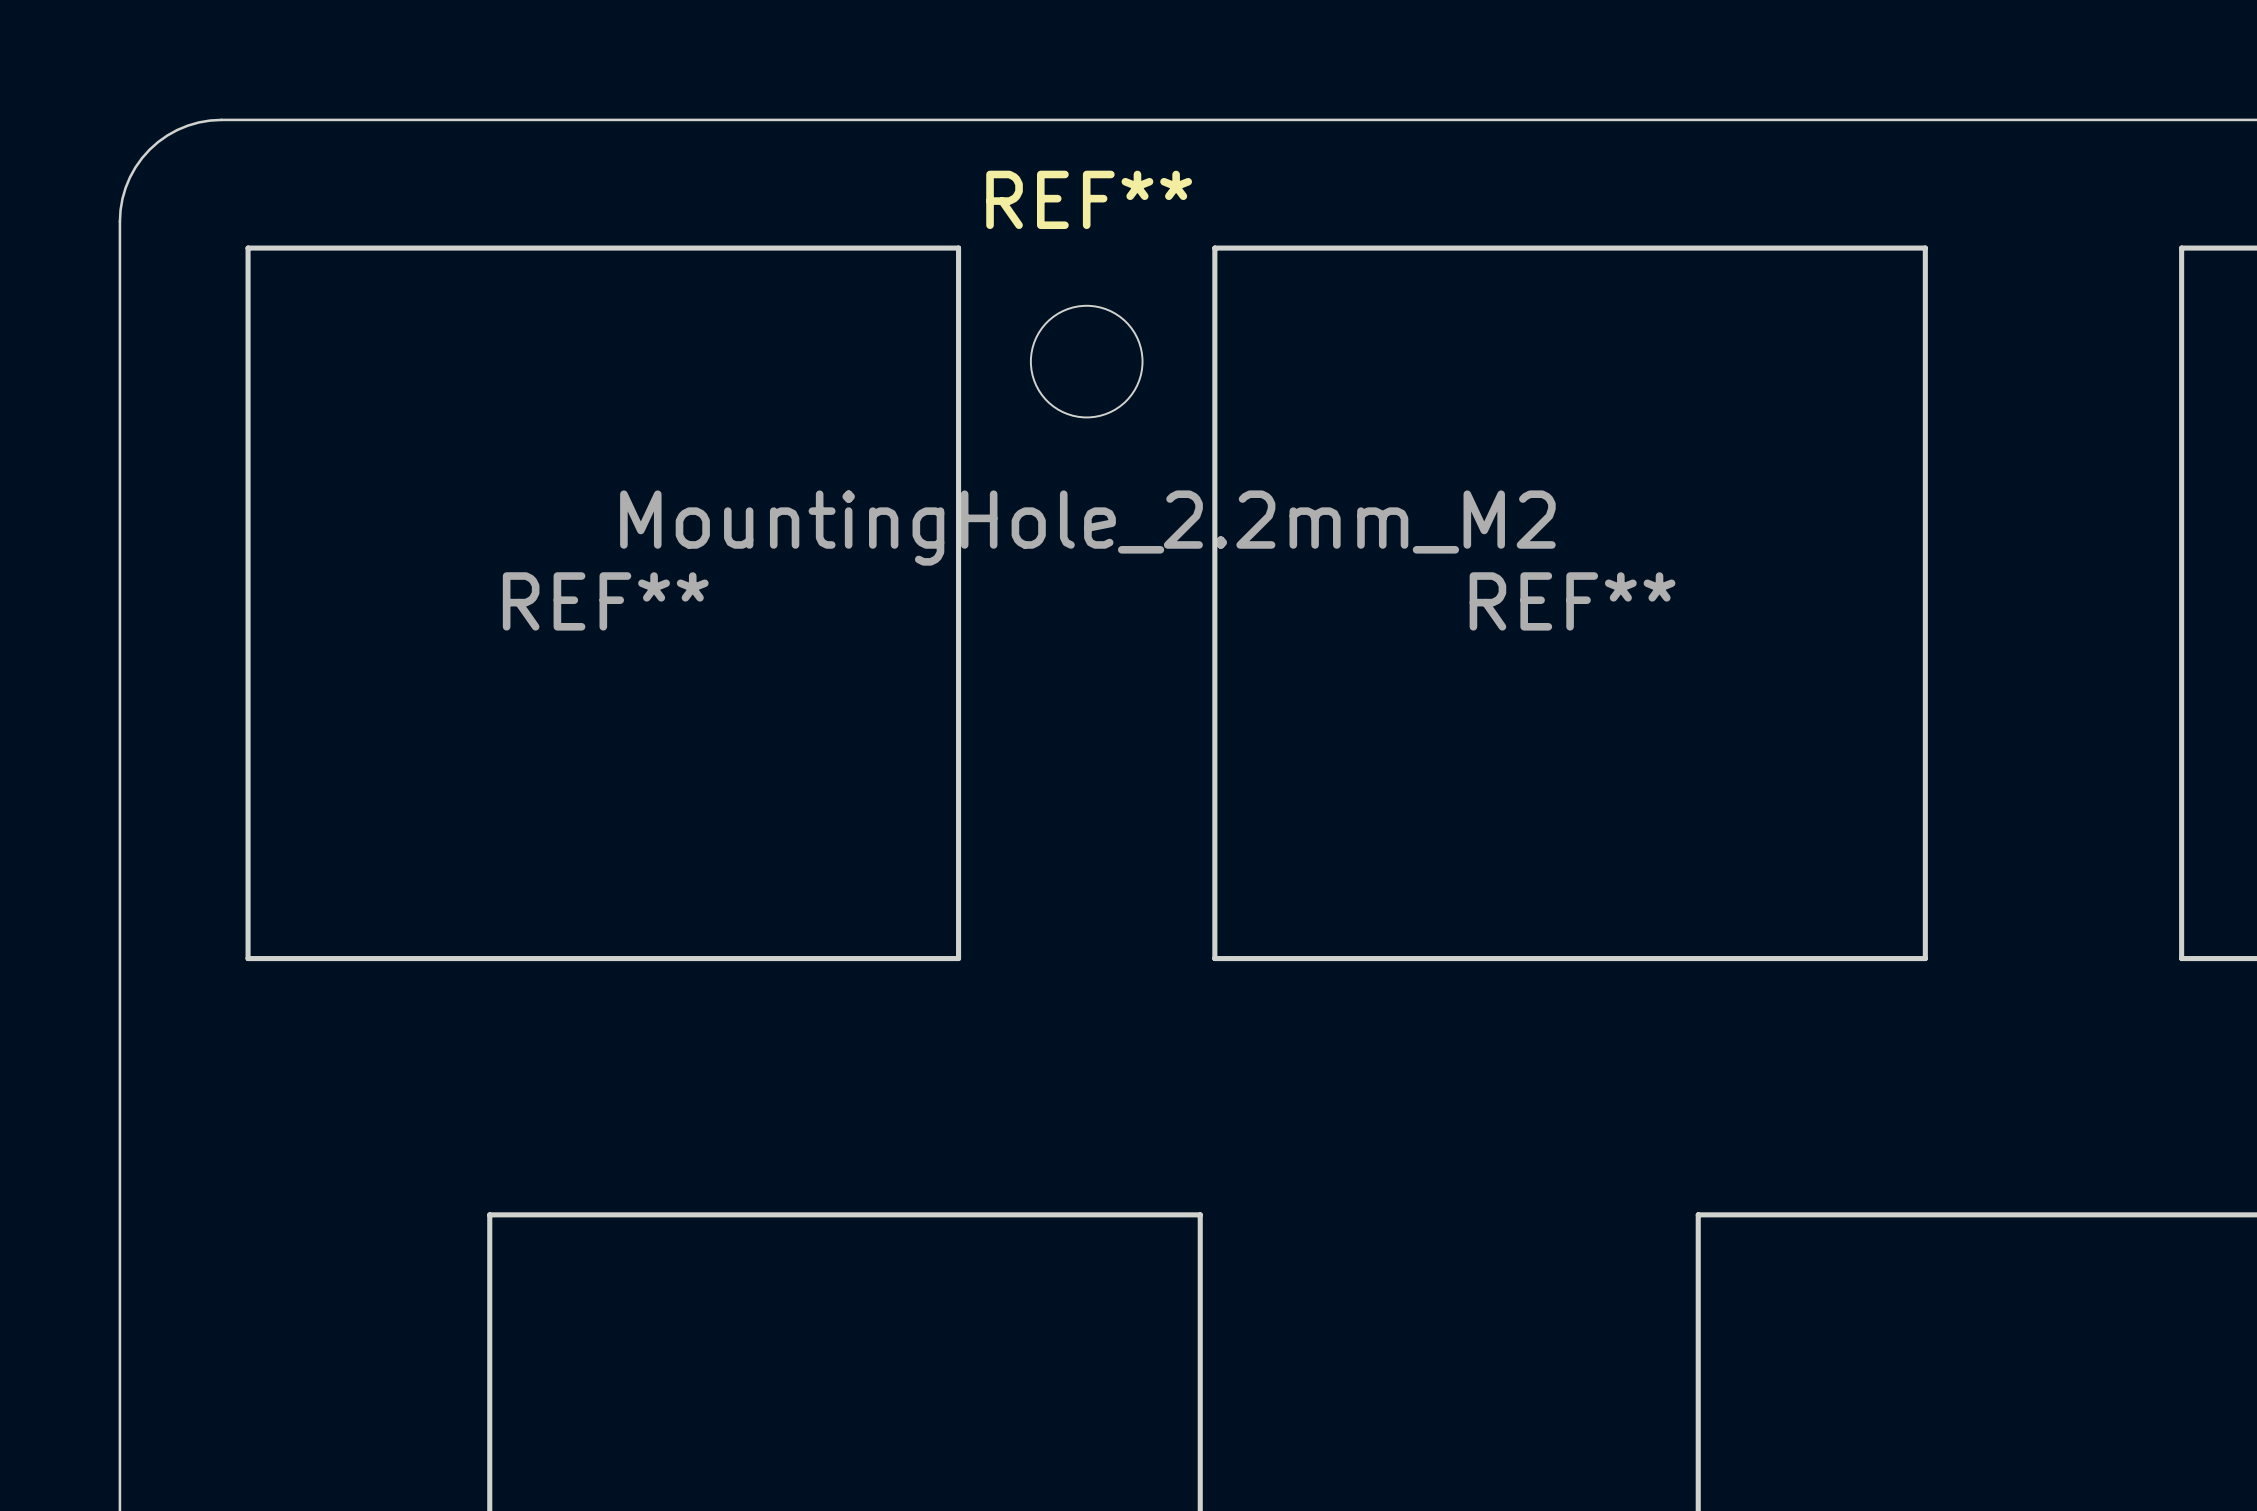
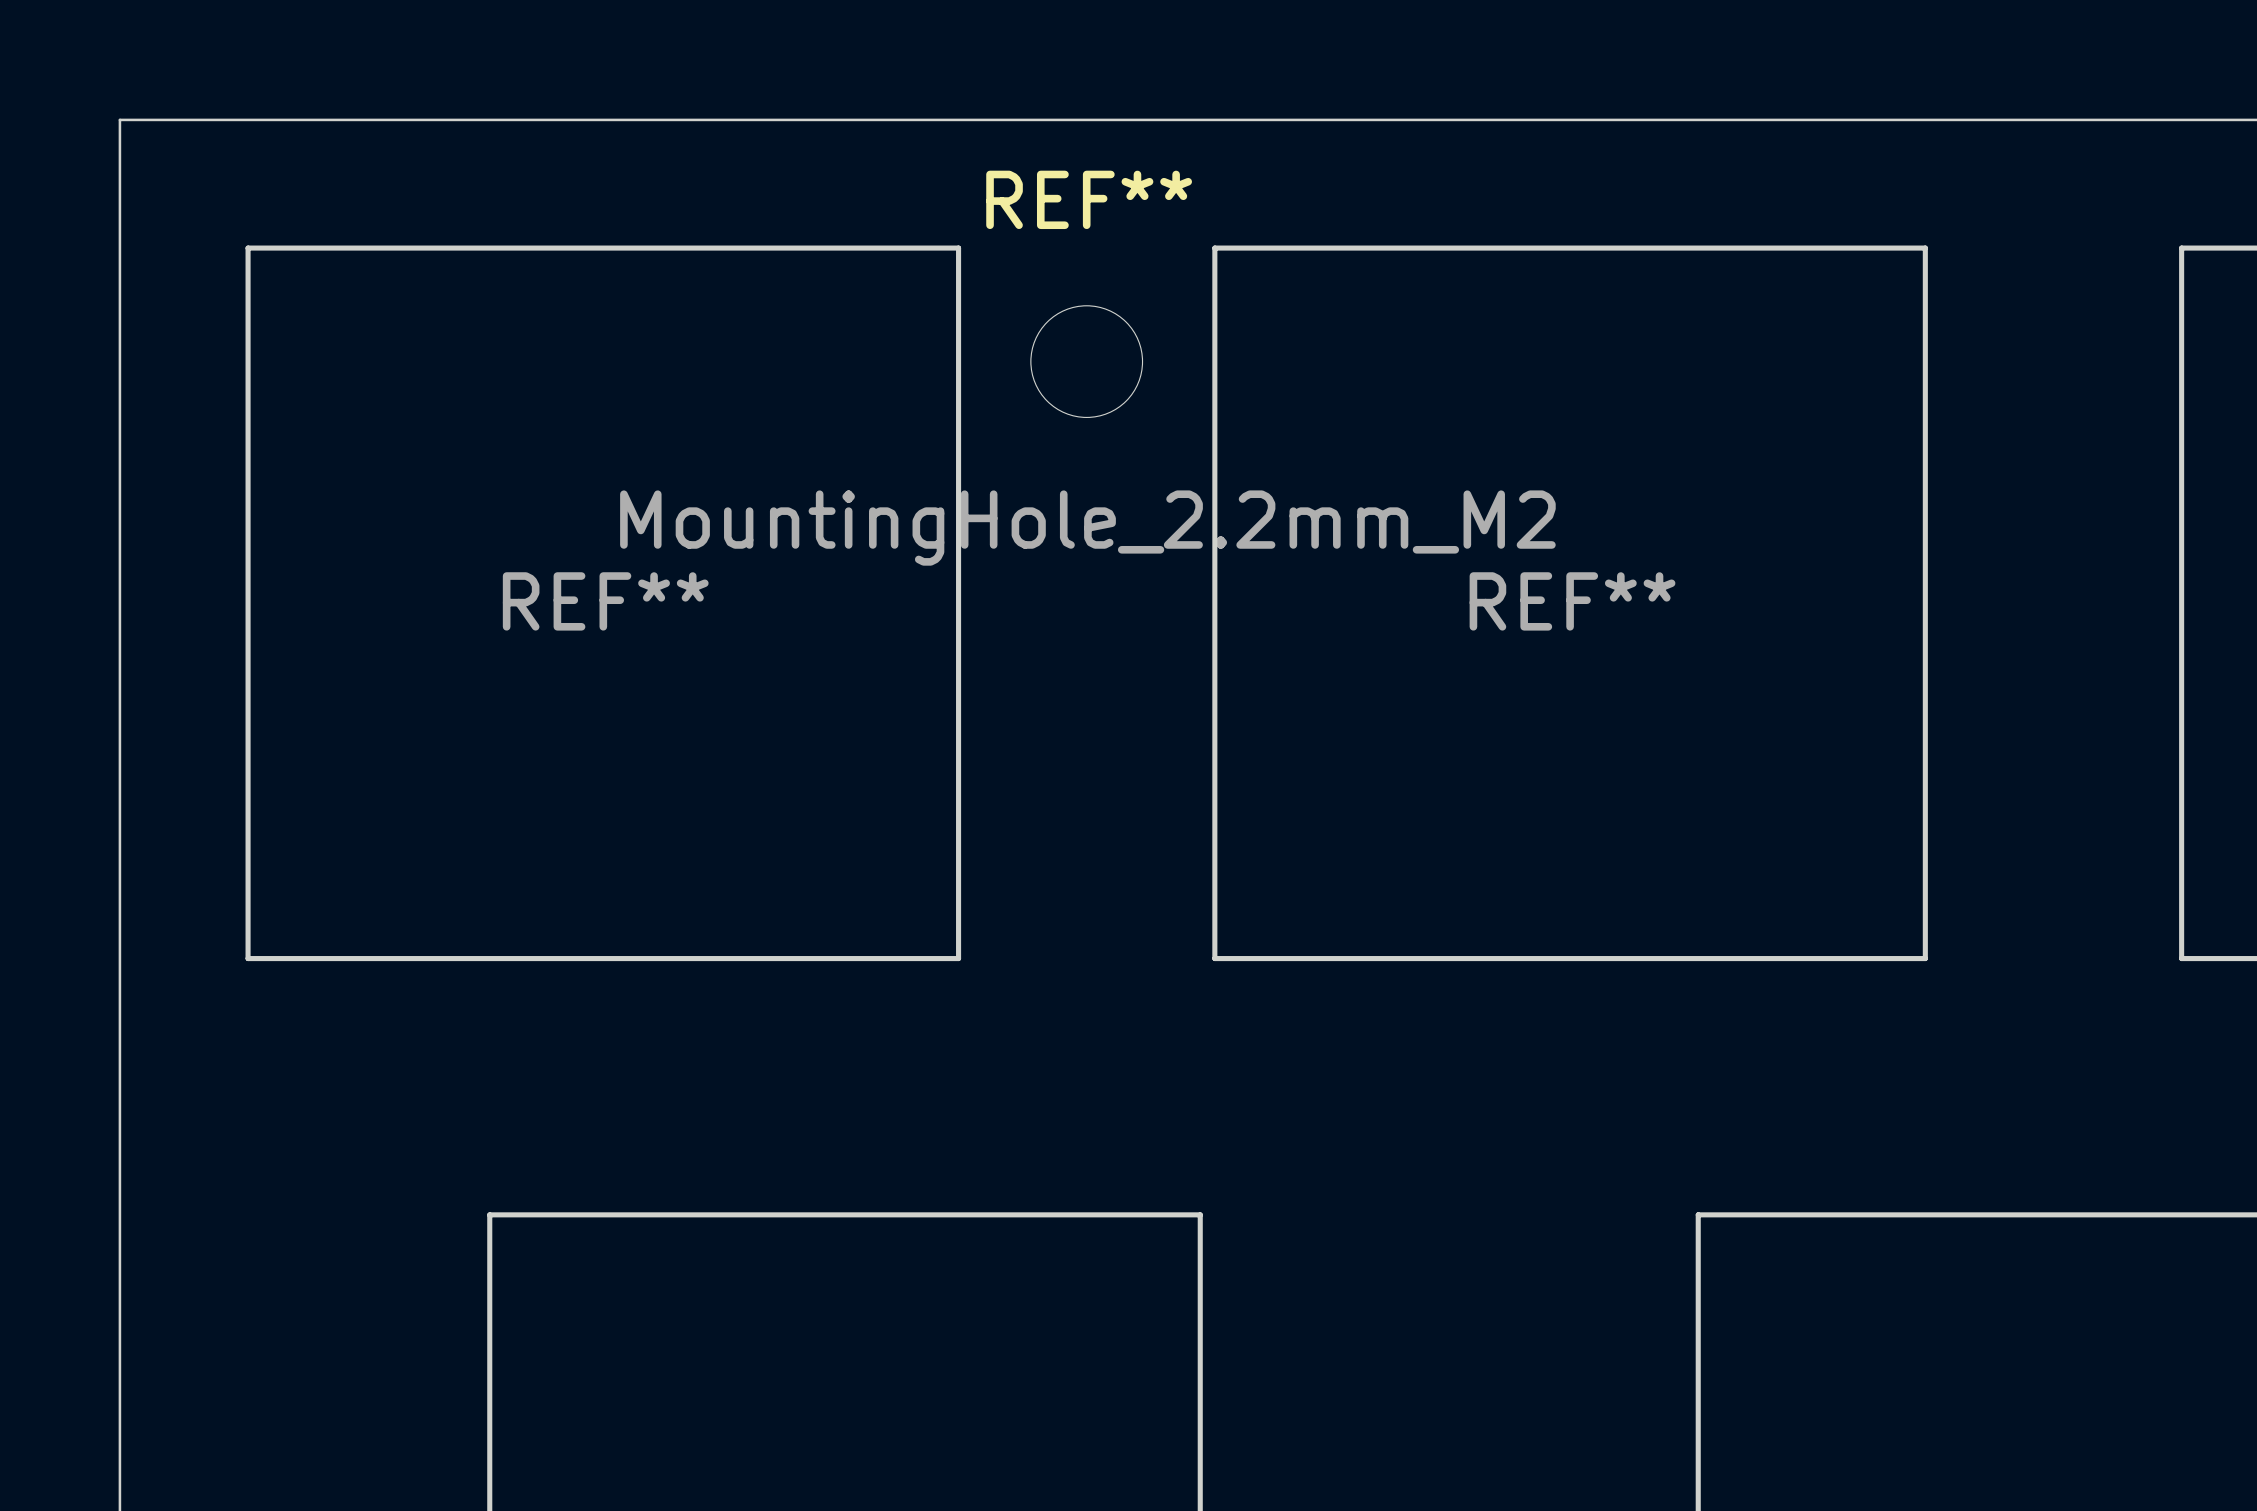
board edge: (221, 119) (198, 122) (177, 129) (149, 149) (129, 177) (122, 198) (119, 221) -> (221, 119) (119, 119) (119, 221)

